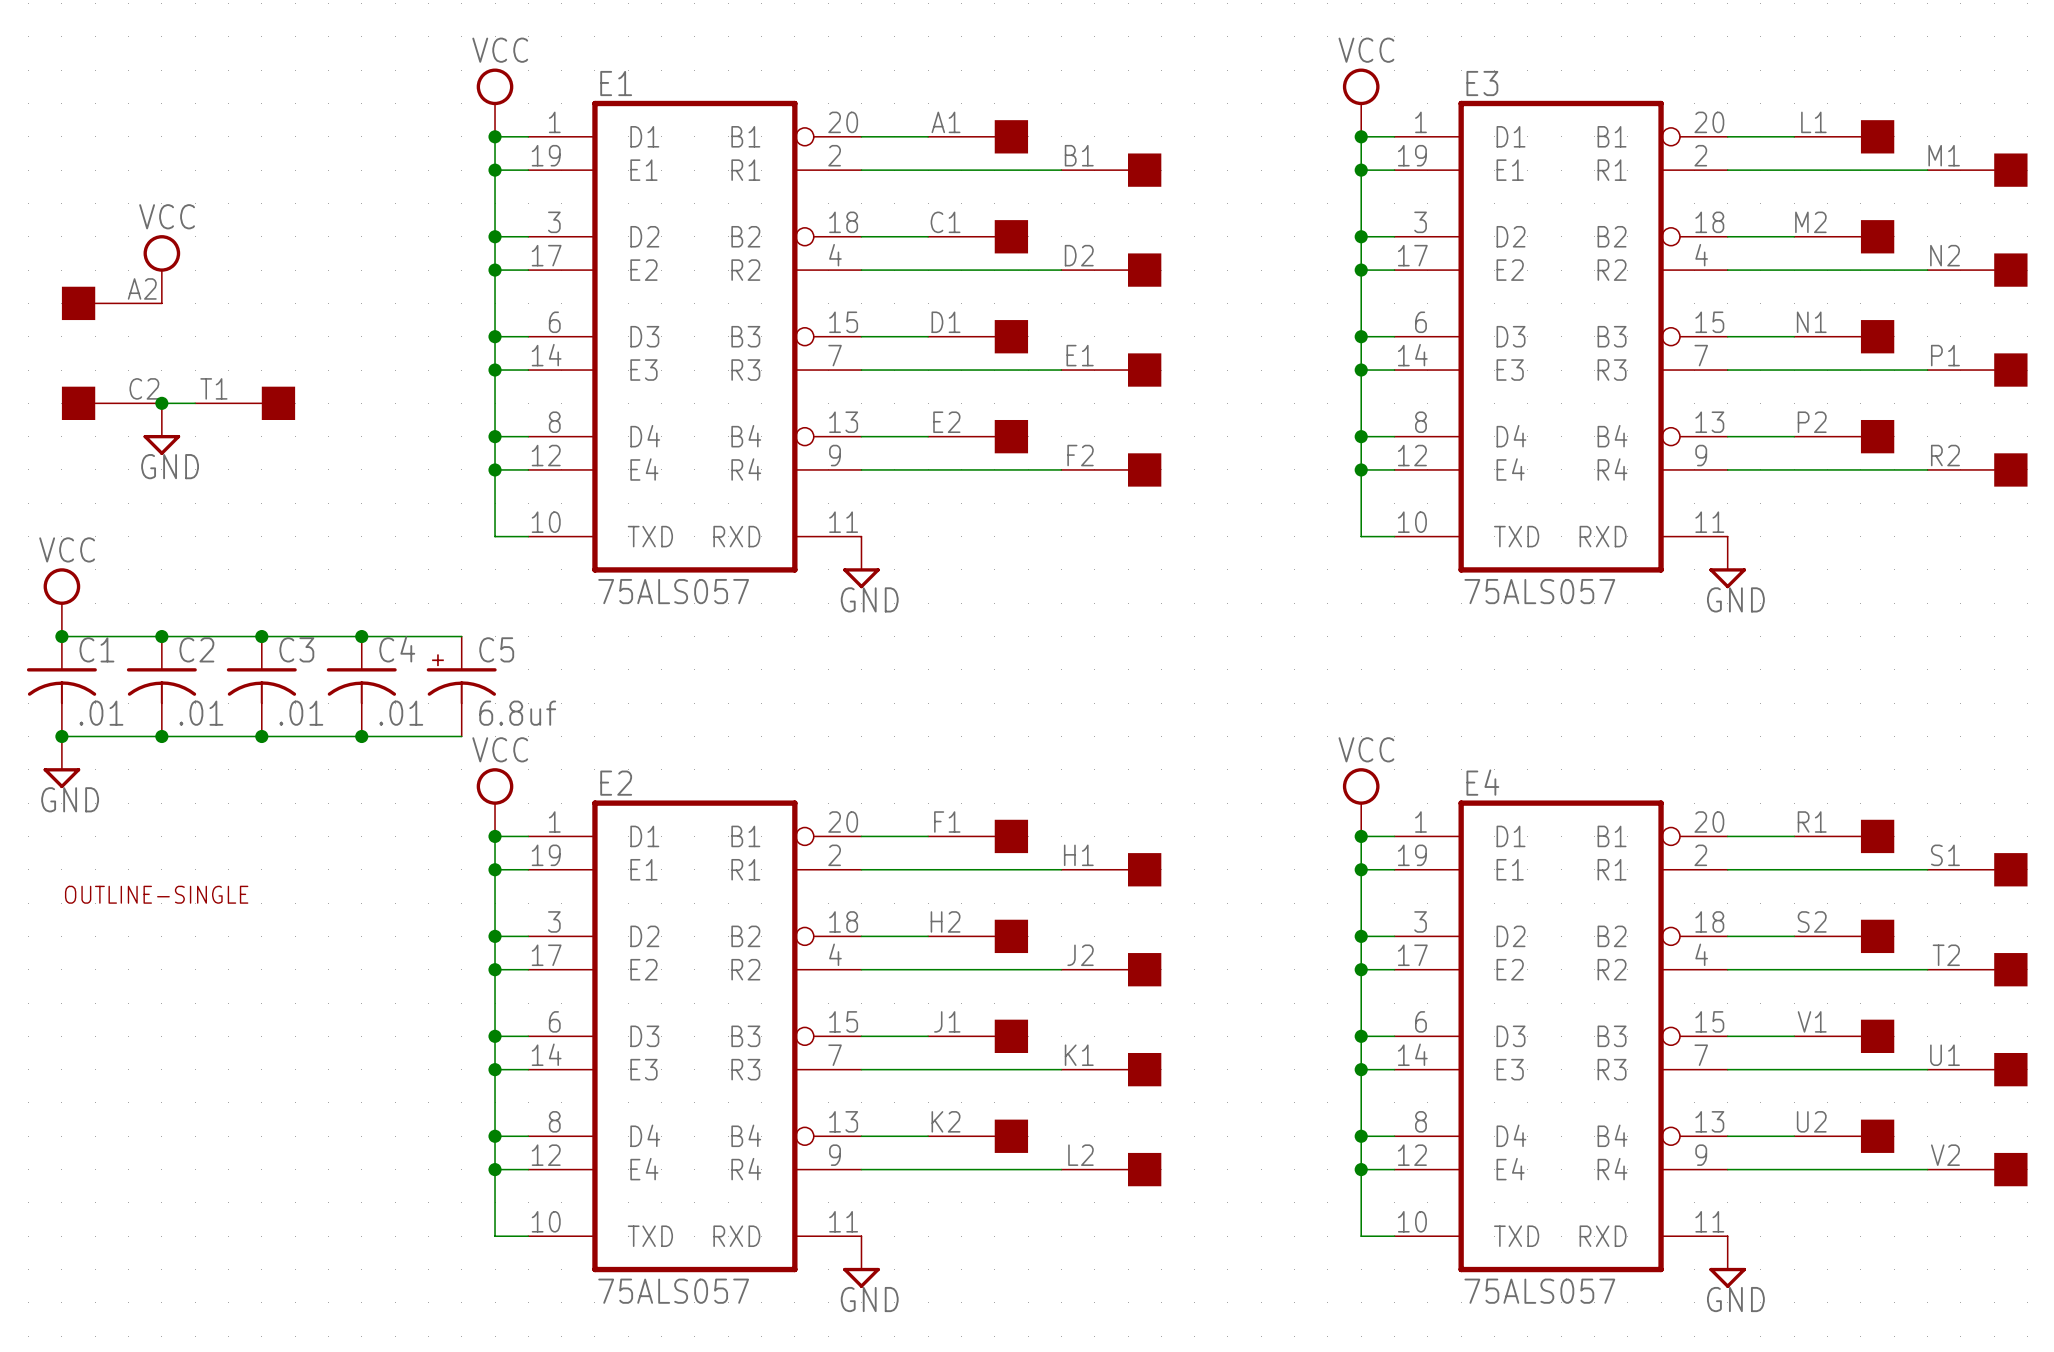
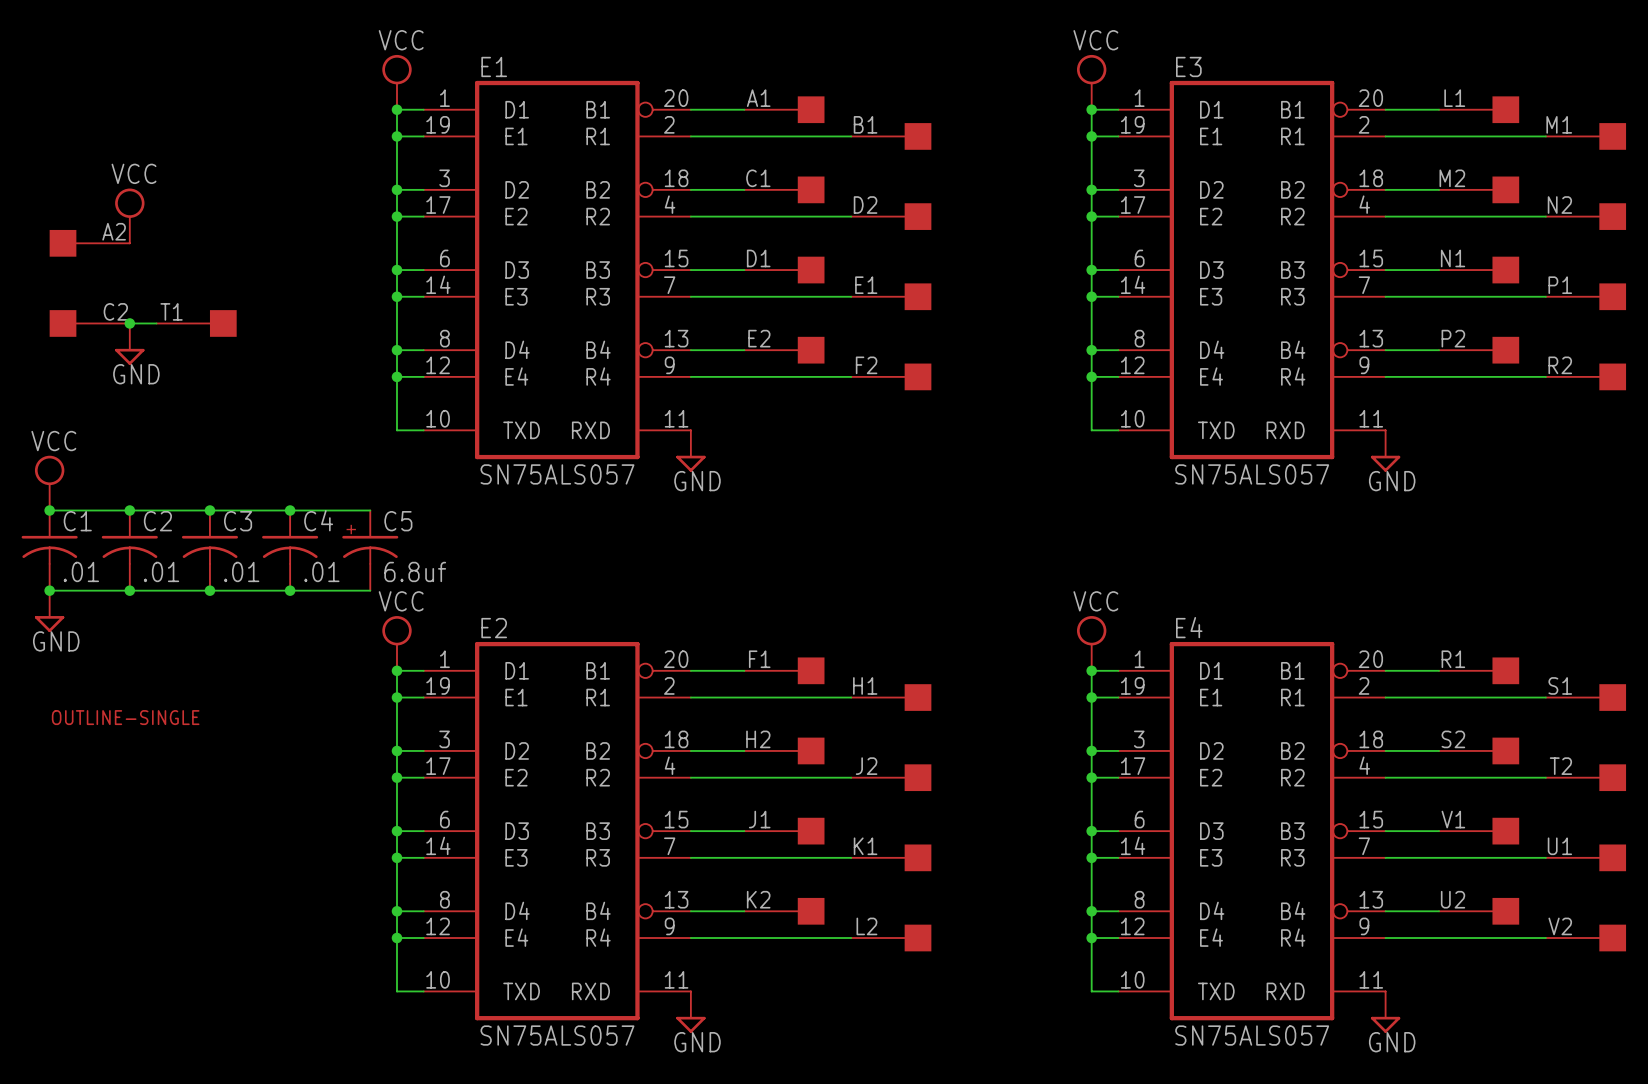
E1 value: 75ALS057 (673, 591) -> SN75ALS057 (557, 474)
E3 value: 75ALS057 (1539, 591) -> SN75ALS057 (1252, 474)
E2 value: 75ALS057 (673, 1291) -> SN75ALS057 (557, 1035)
E4 value: 75ALS057 (1539, 1291) -> SN75ALS057 (1252, 1035)

